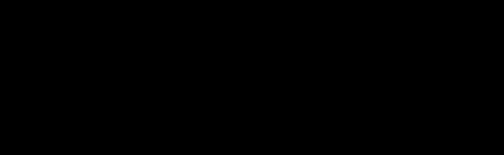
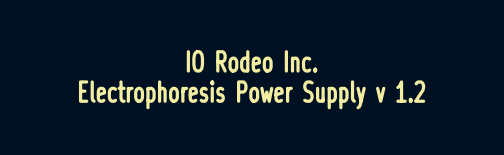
text: none -> IO Rodeo Inc. (252, 61)
text: none -> Electrophoresis Power Supply v 1.2 (252, 94)

